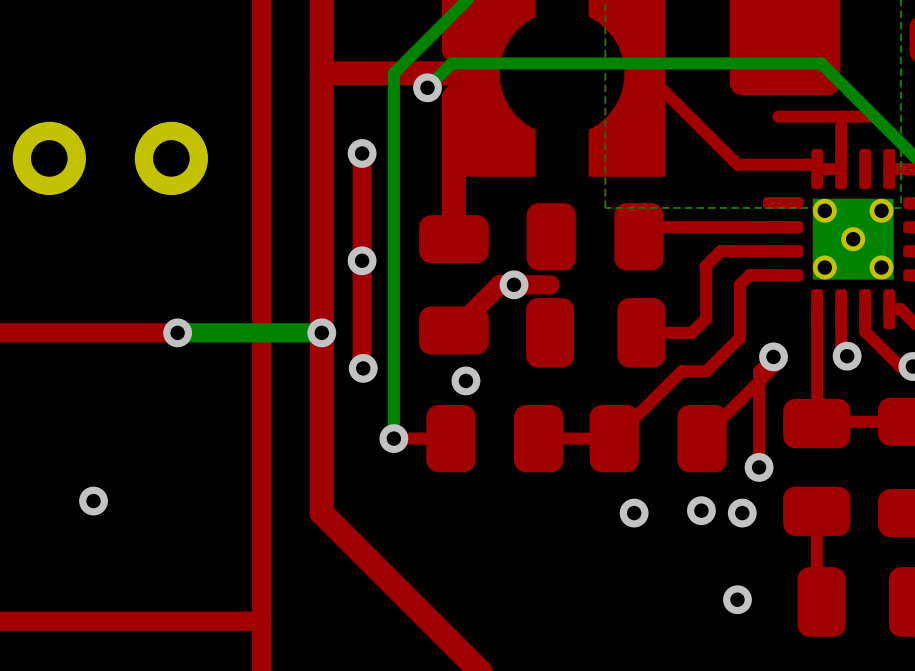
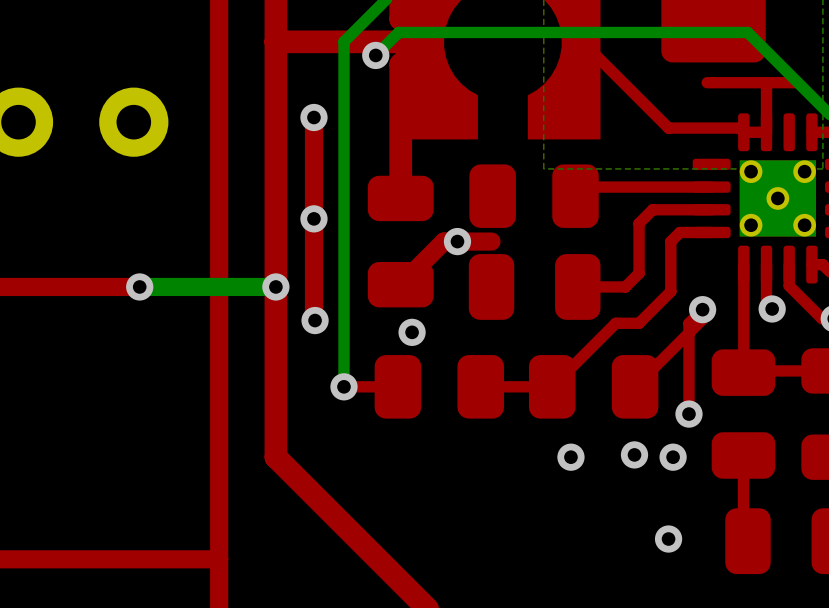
via: (93, 501) -> none

